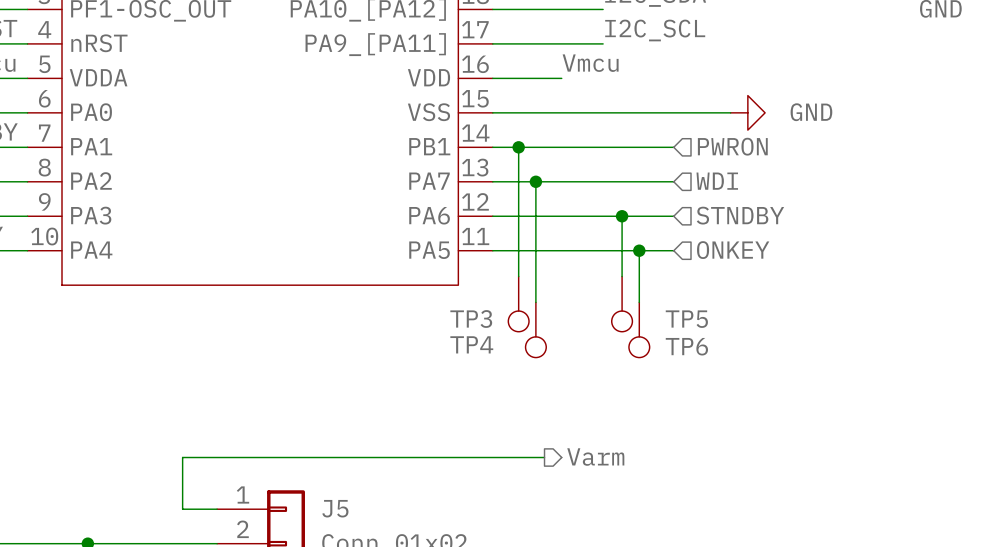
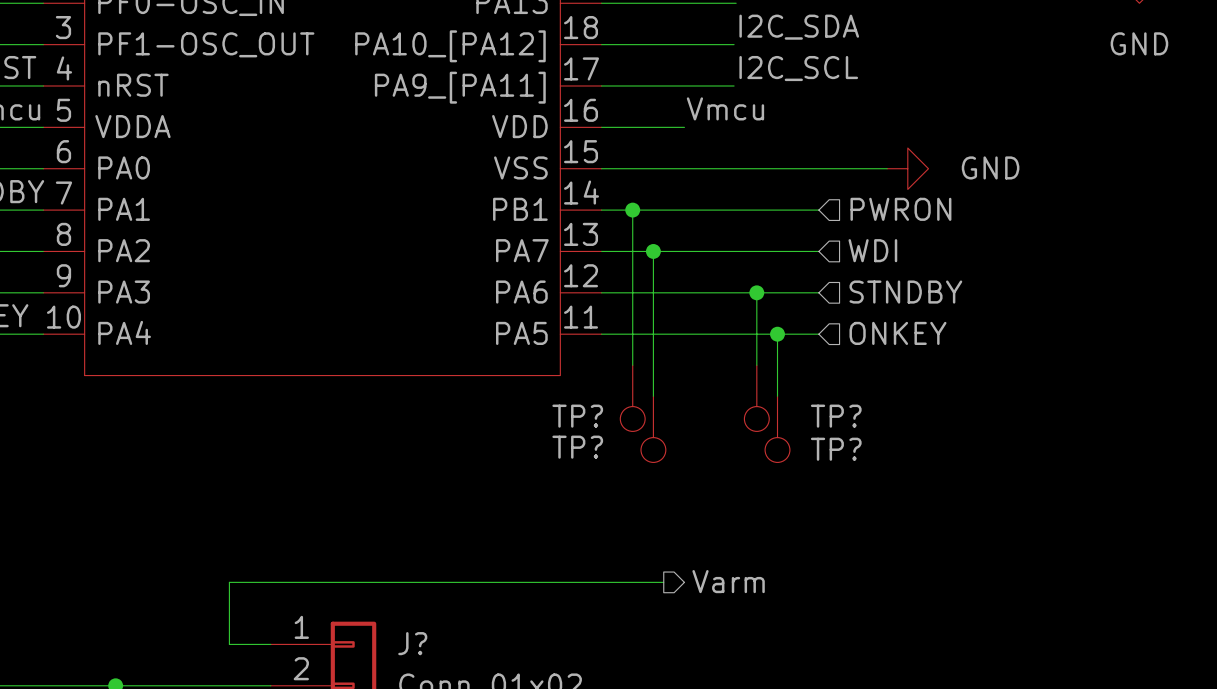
TP3 name: TP3 (471, 319) -> TP? (577, 416)
TP5 name: TP5 (686, 319) -> TP? (836, 416)
TP4 name: TP4 (471, 344) -> TP? (577, 447)
TP6 name: TP6 (686, 346) -> TP? (836, 449)
J5 name: J5 (335, 508) -> J? (412, 643)

